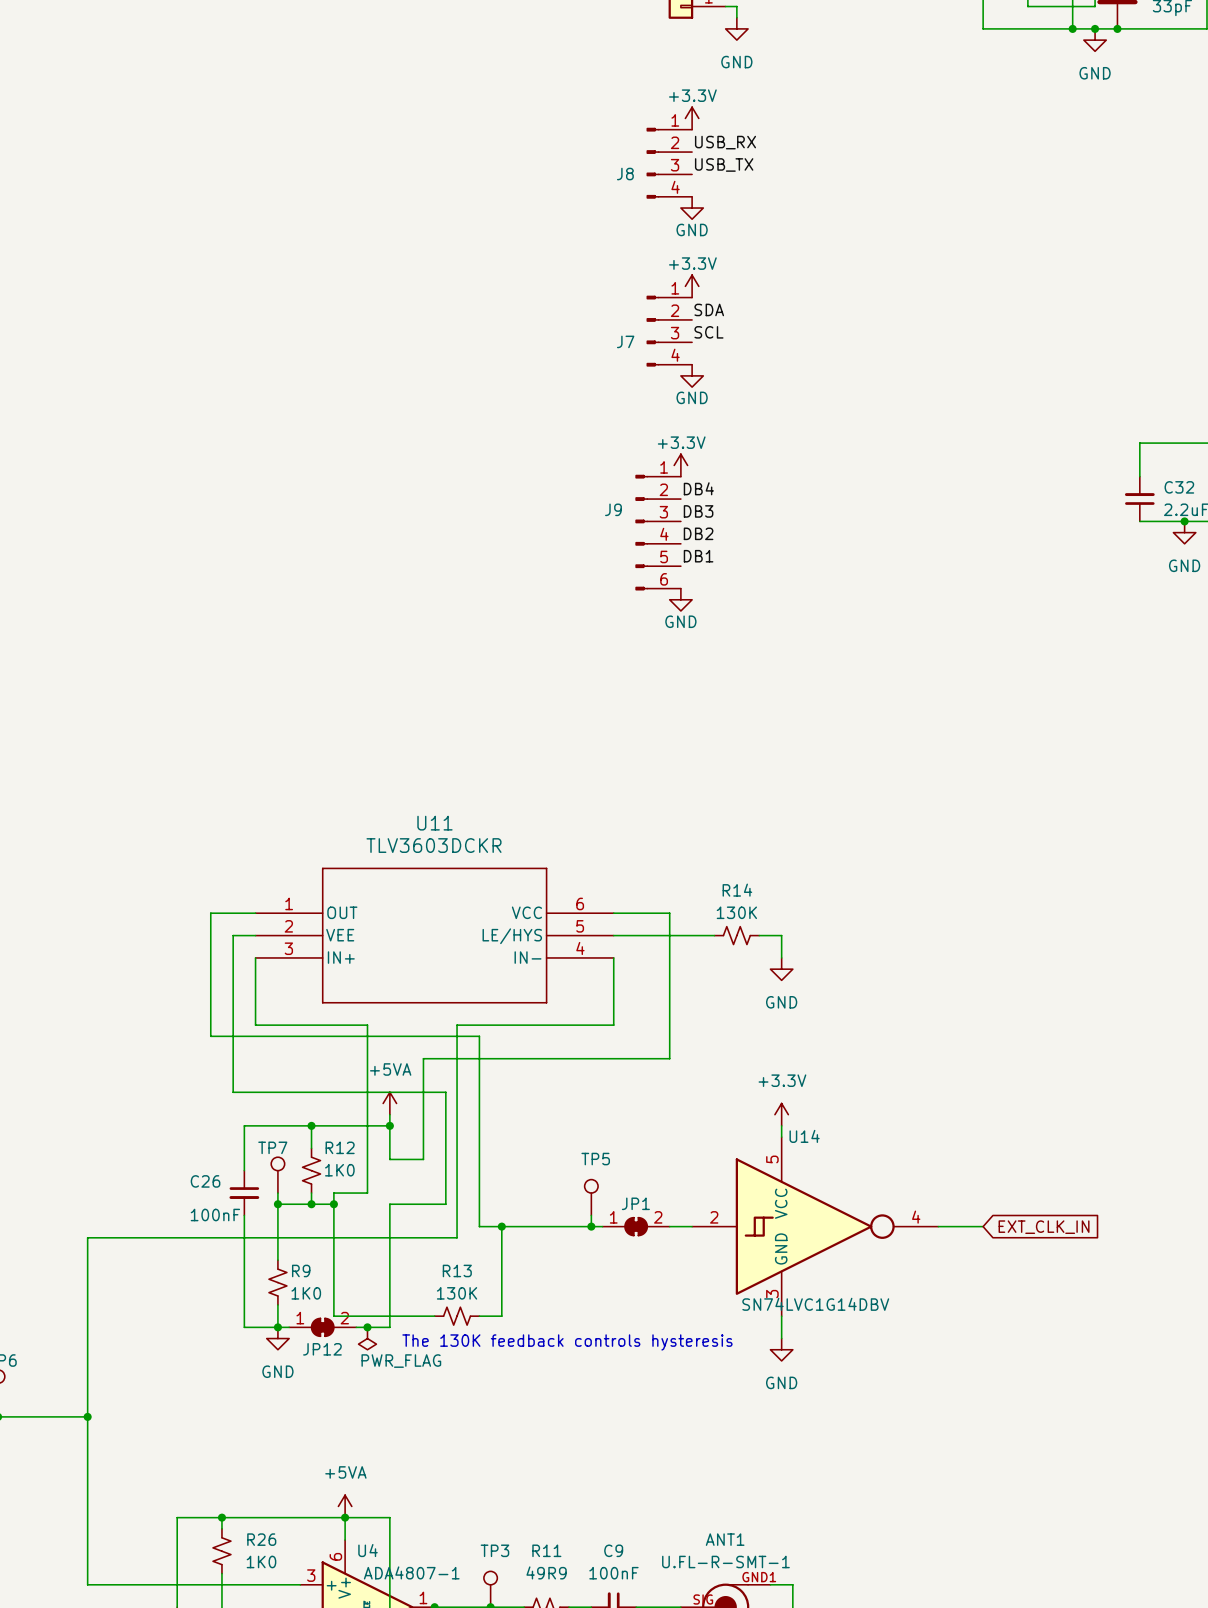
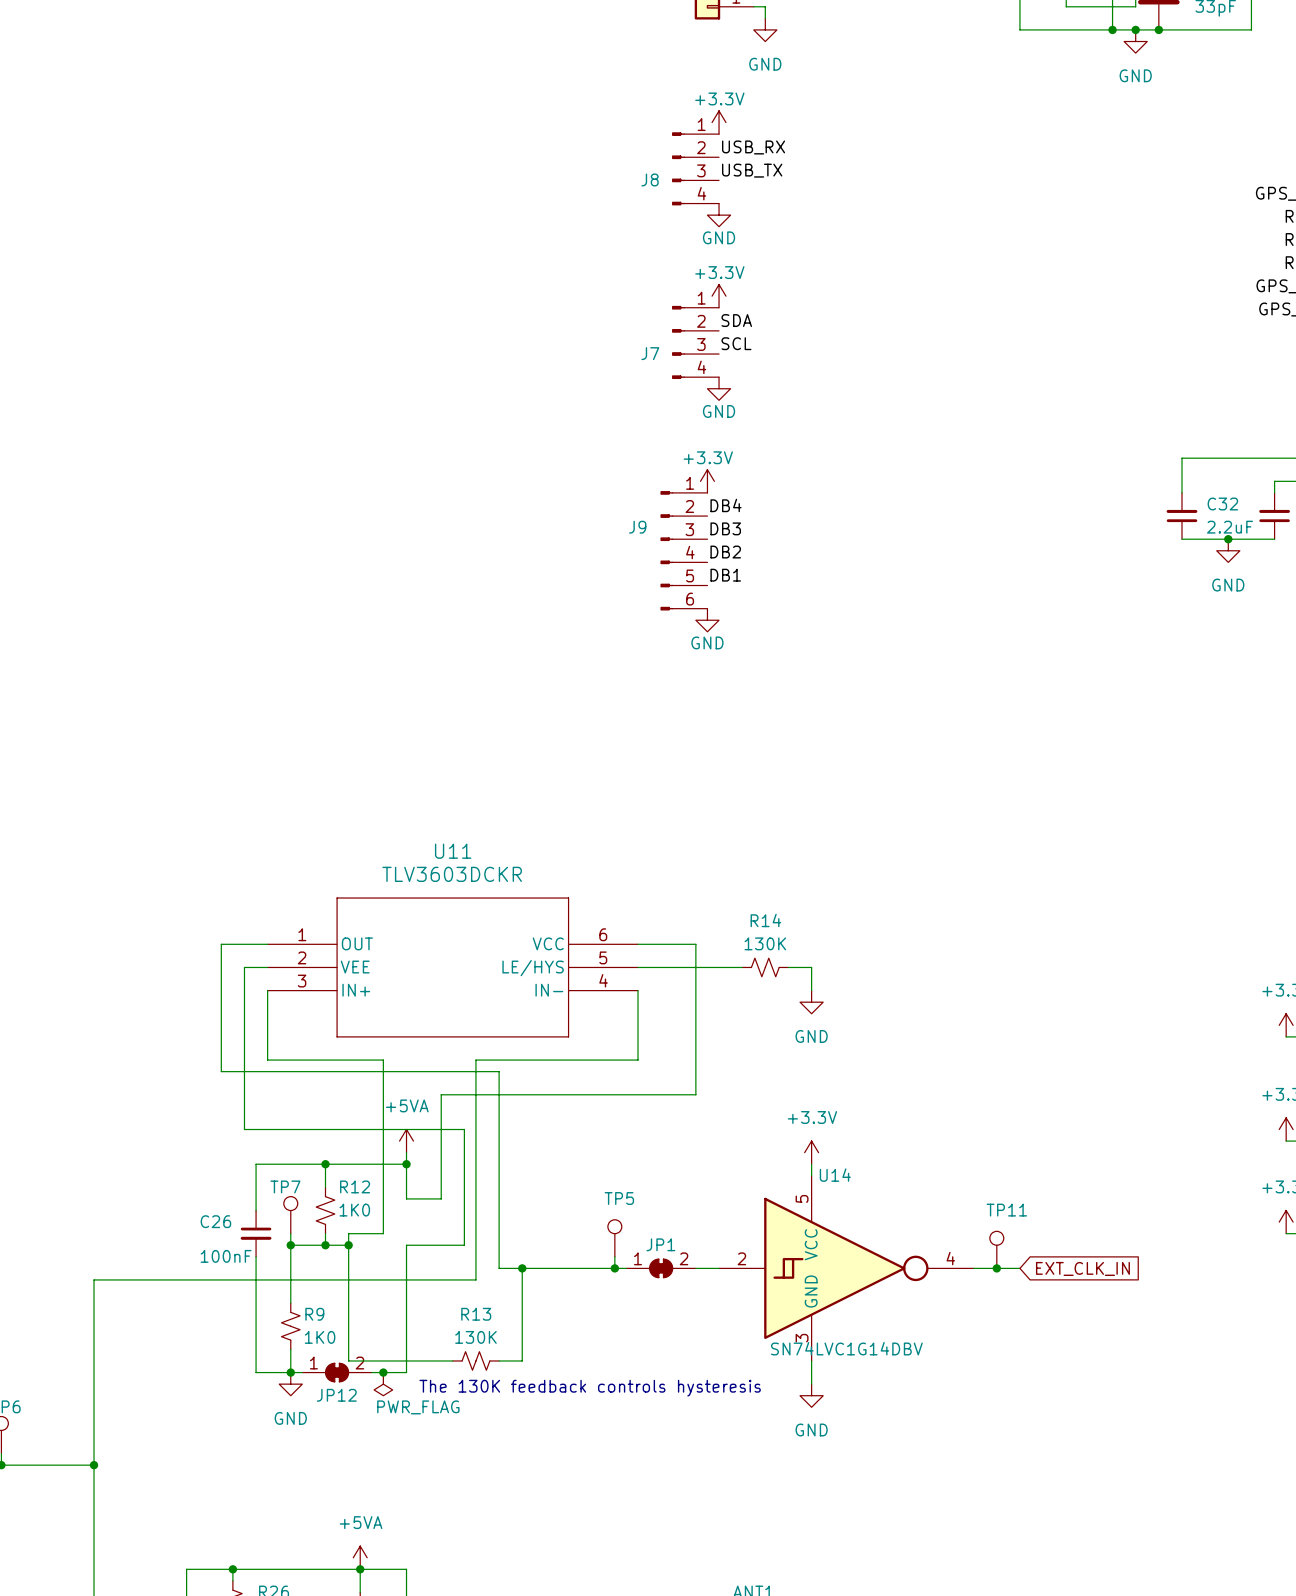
TP11: none -> (996, 1249)
junction: none -> (996, 1268)

